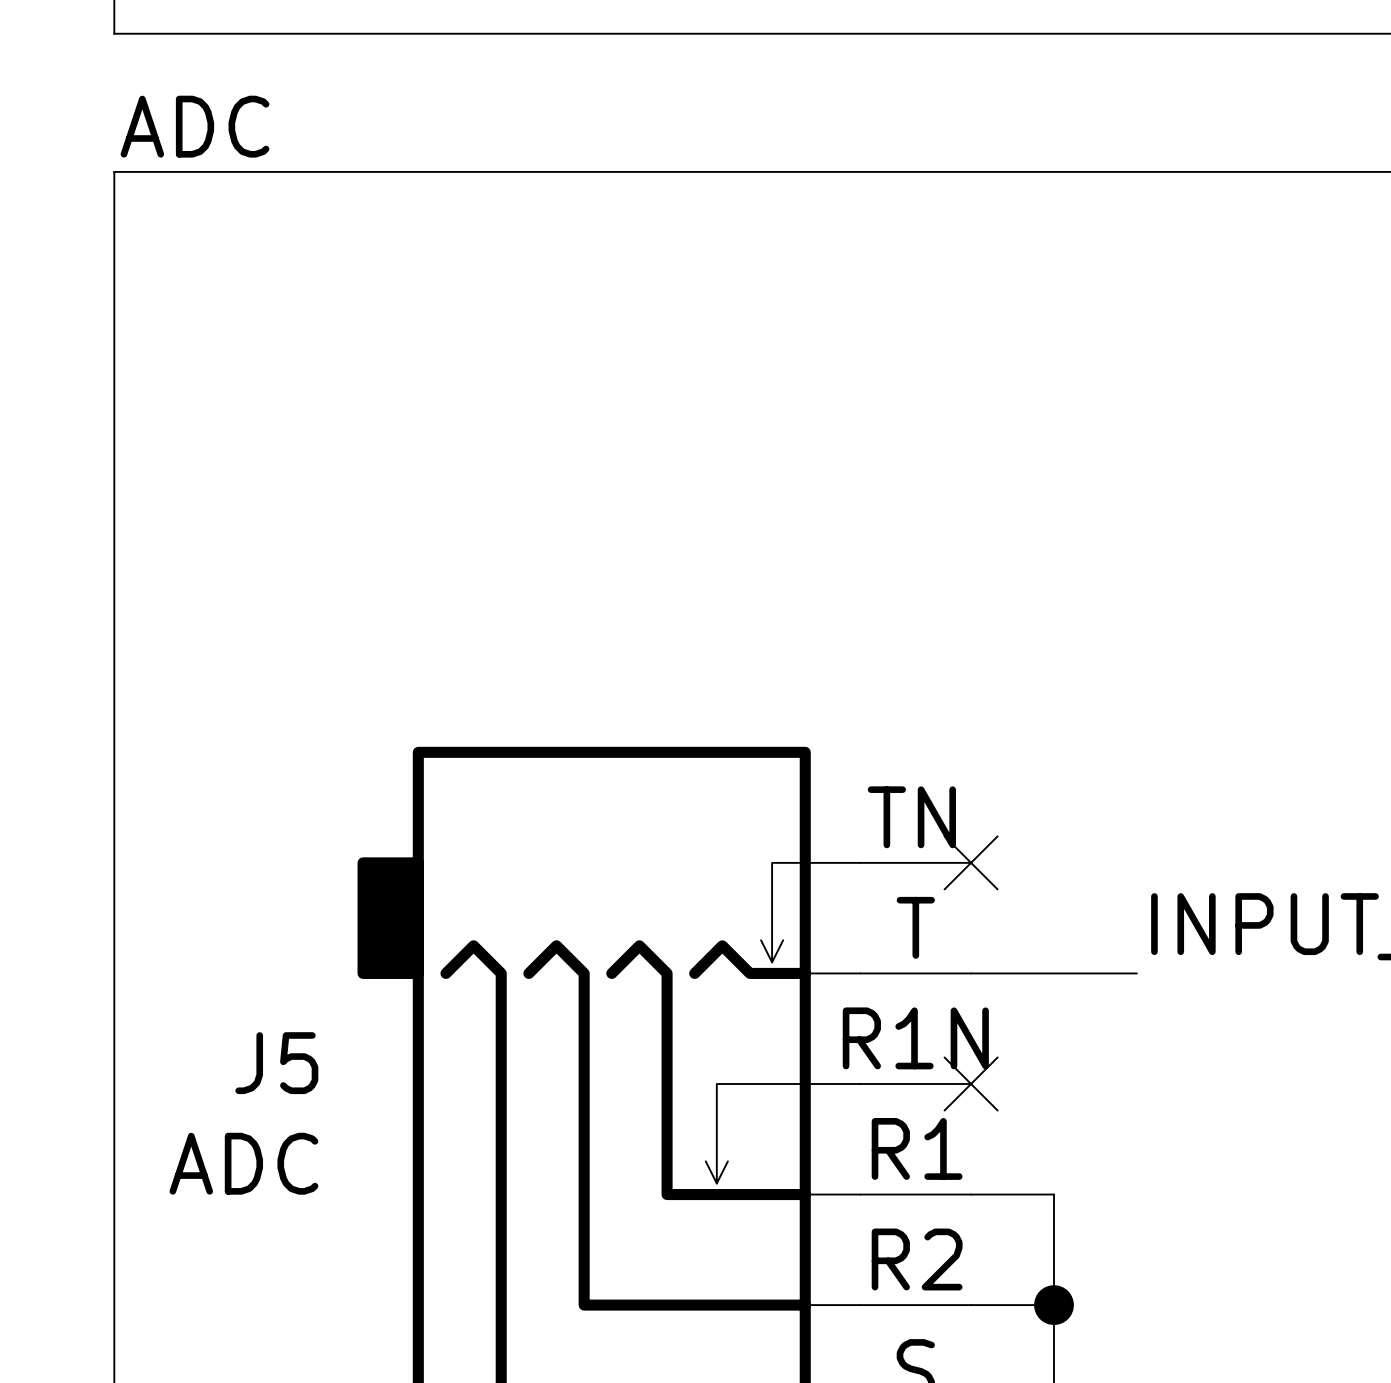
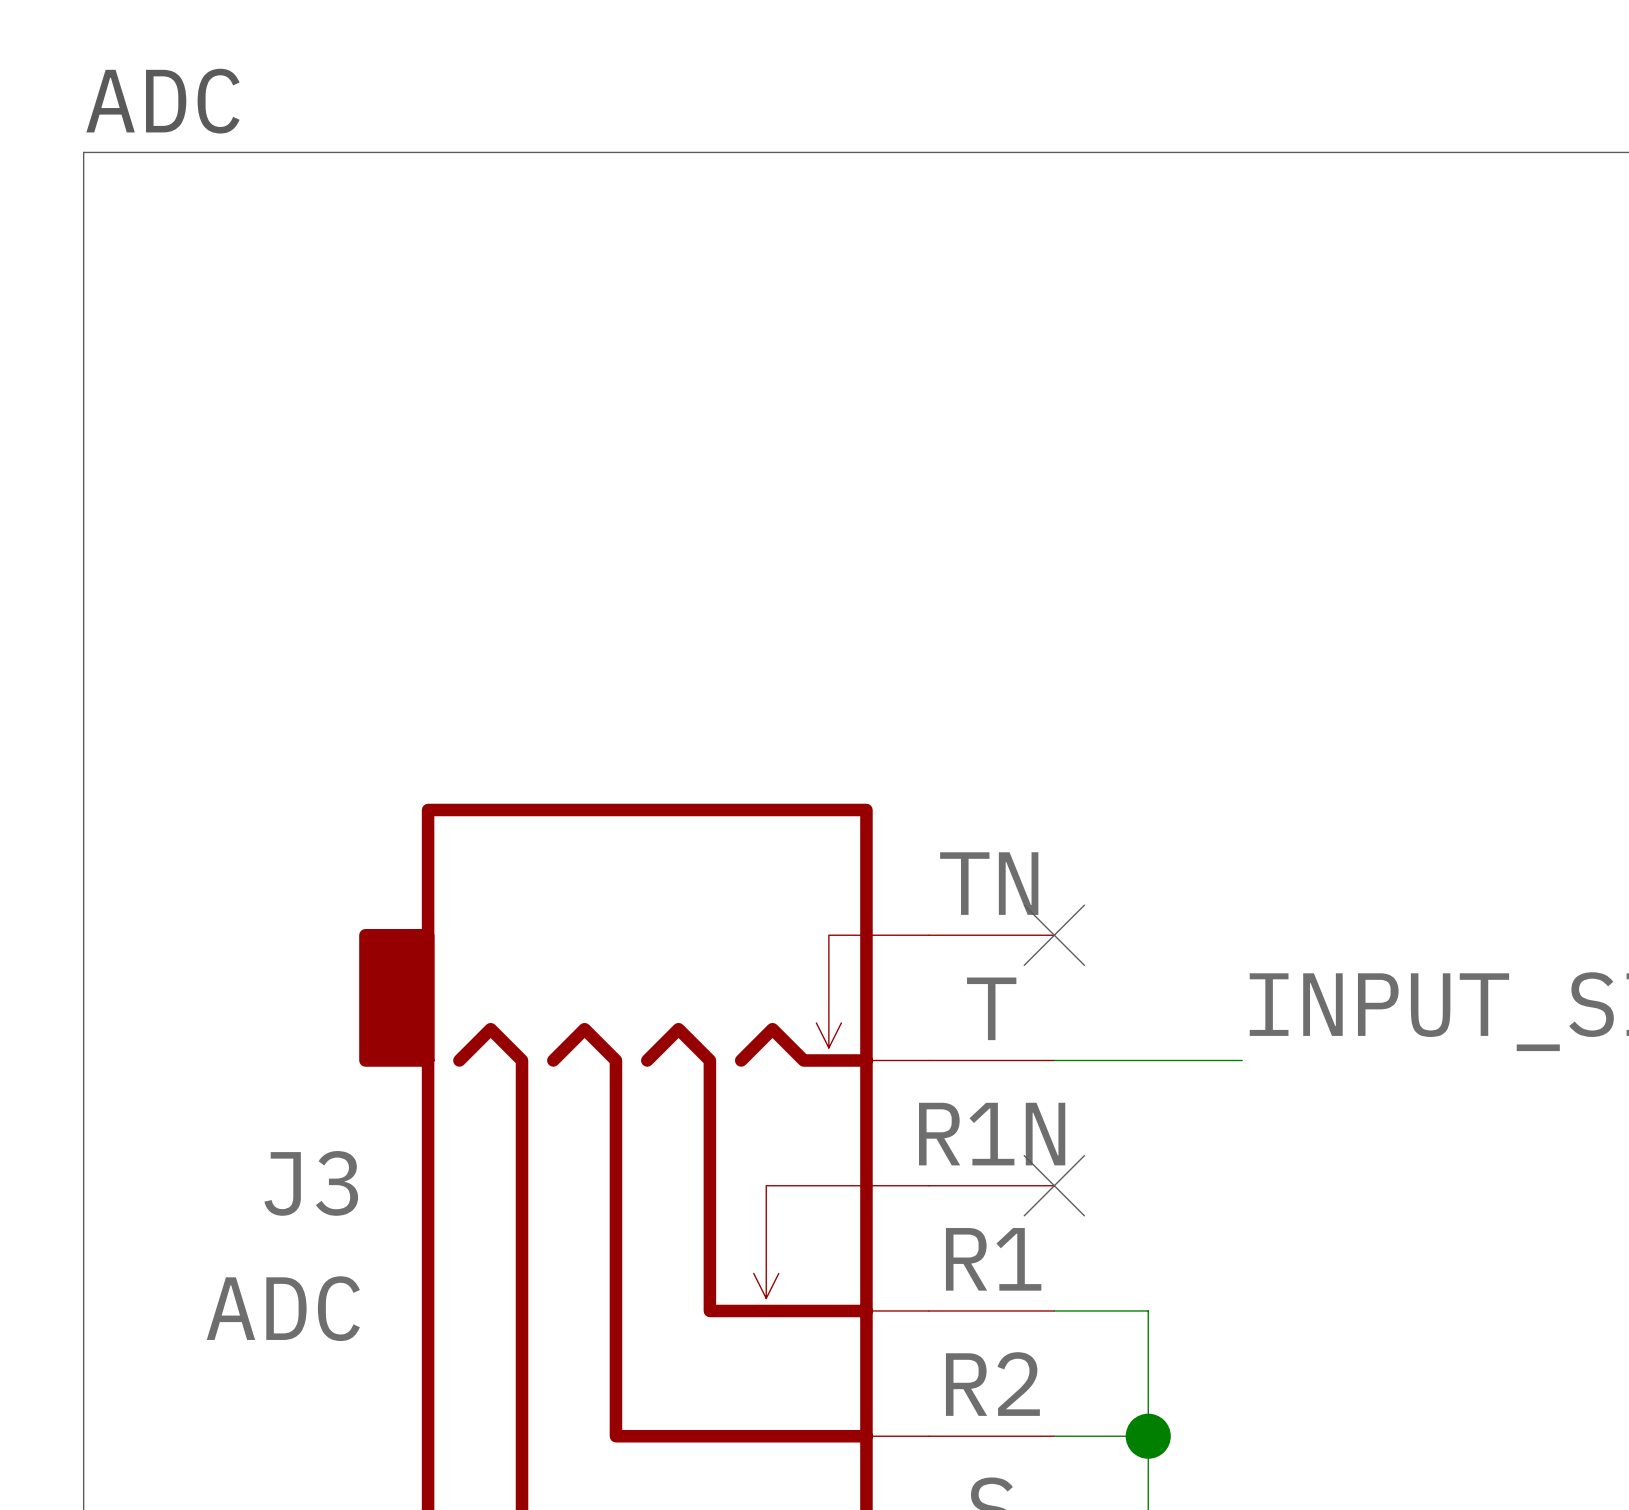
J5 name: J5 (276, 1063) -> J3 (311, 1183)
J5 value position: ADC (243, 1163) -> ADC (283, 1308)

